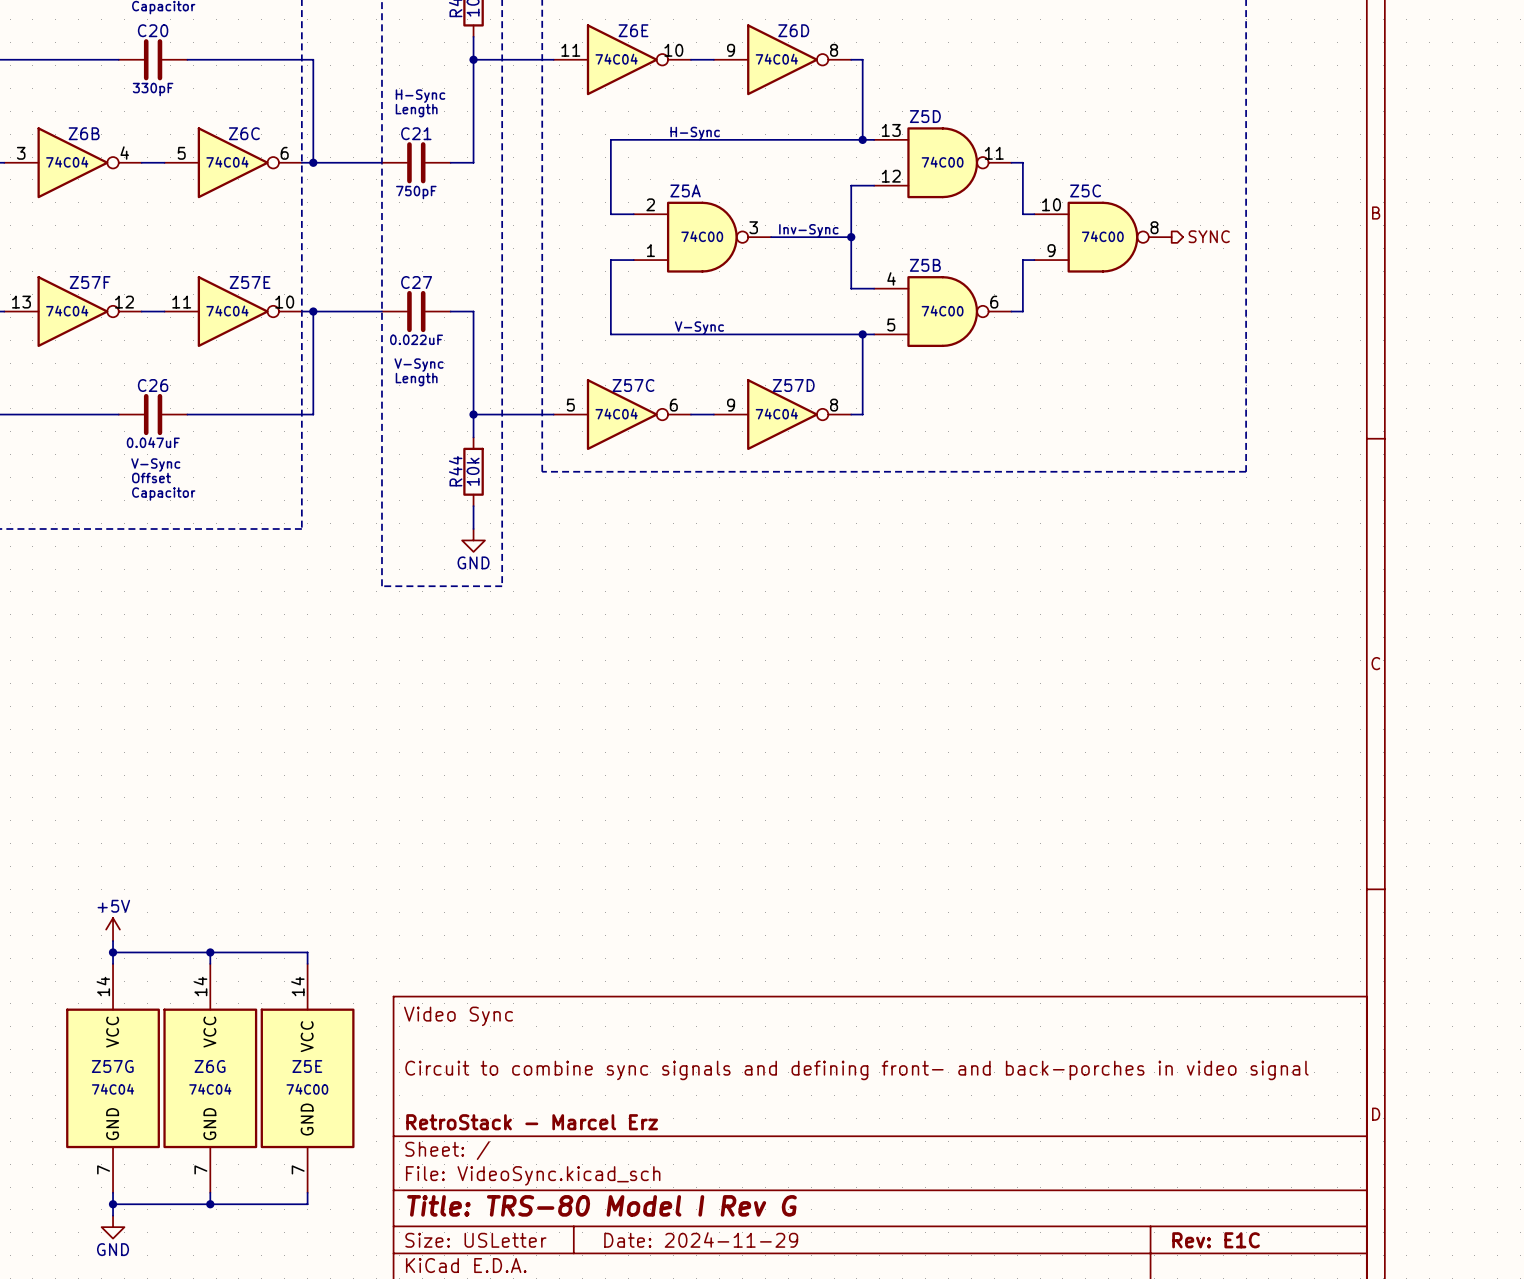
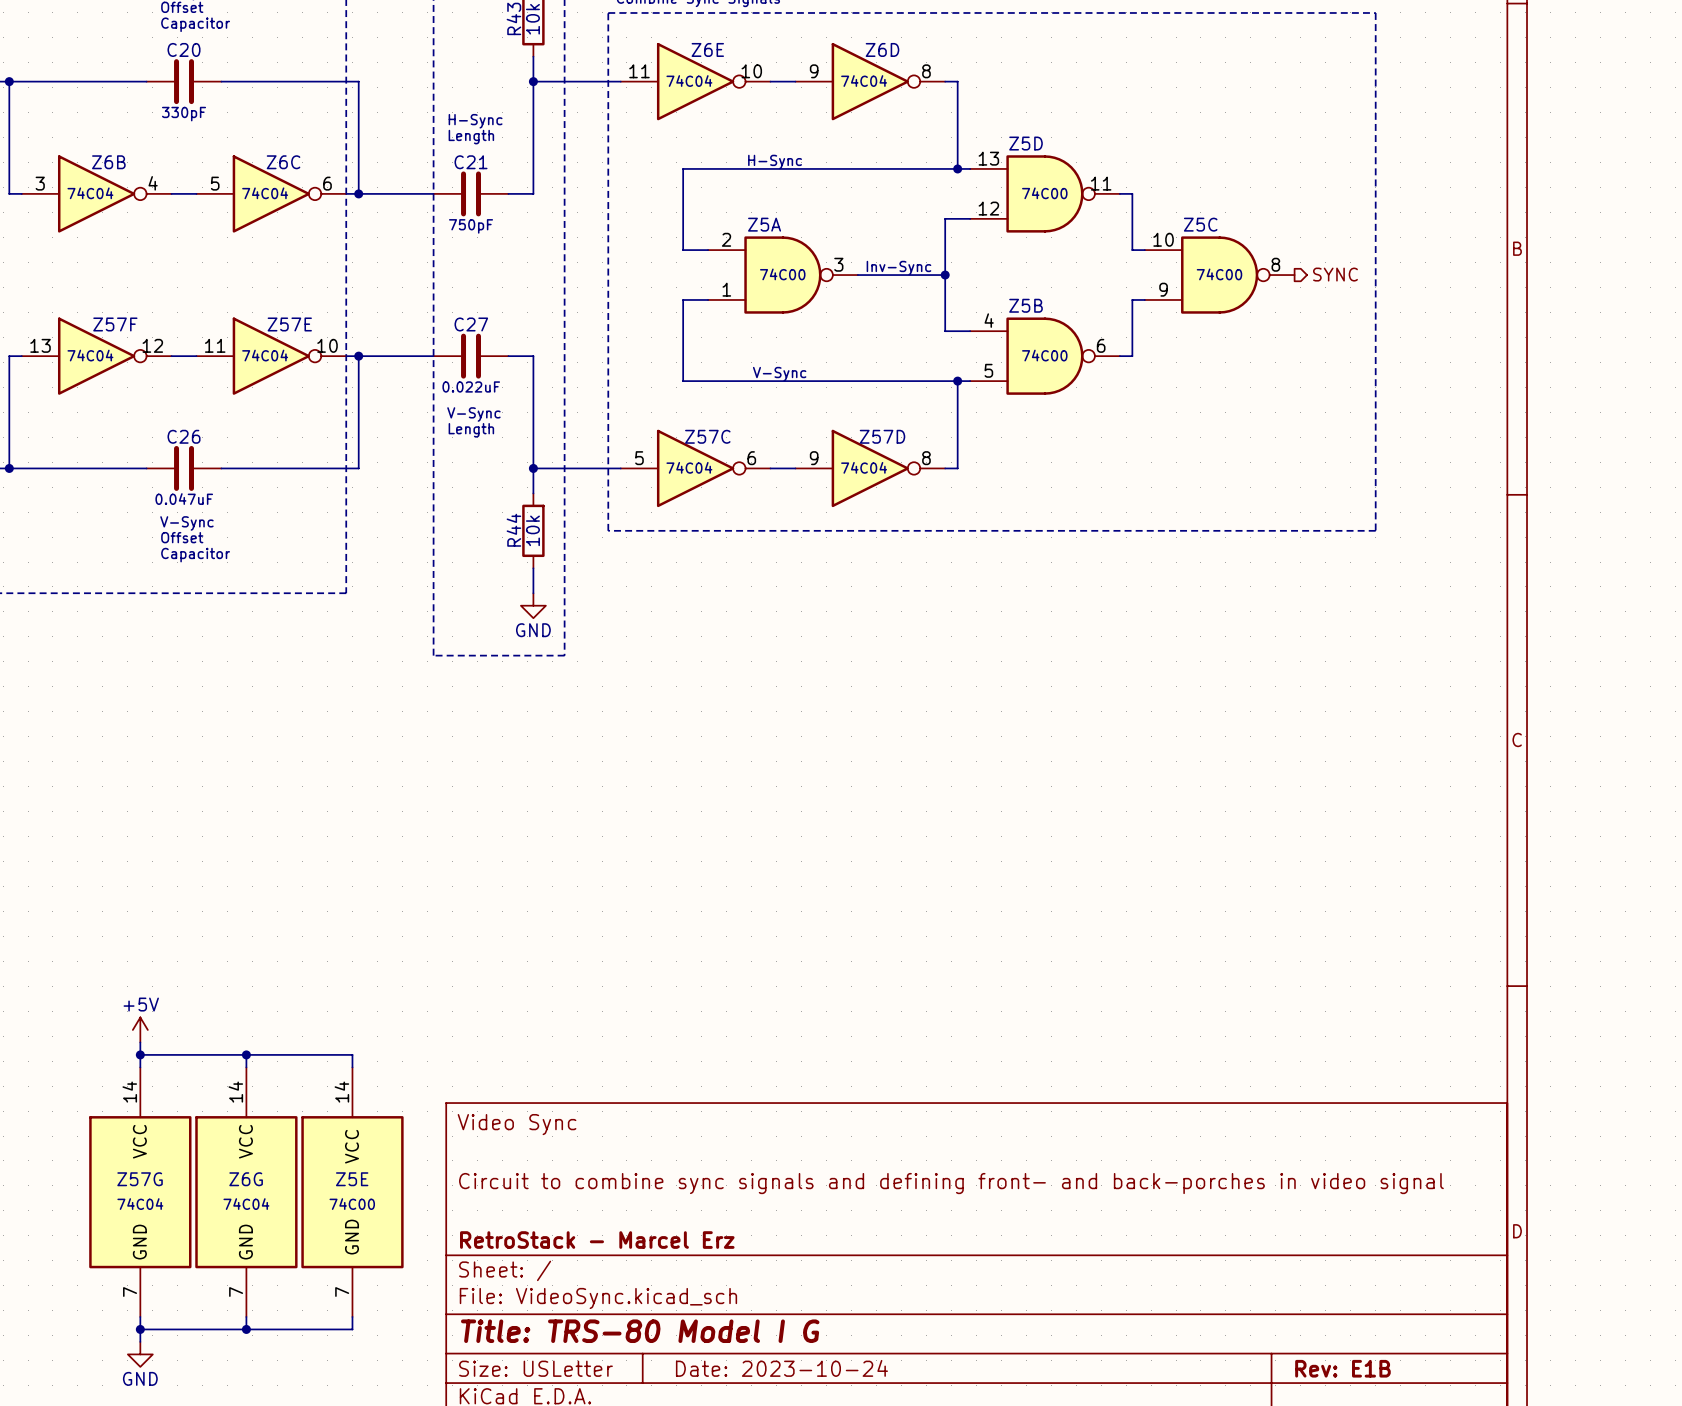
title block: Title: TRS-80 Model I Rev G (601, 1205) -> Title: TRS-80 Model I G (640, 1331)
title block: Date: 2024-11-29 (701, 1239) -> Date: 2023-10-24 (781, 1368)
title block: Rev: E1C (1216, 1240) -> Rev: E1B (1342, 1368)

